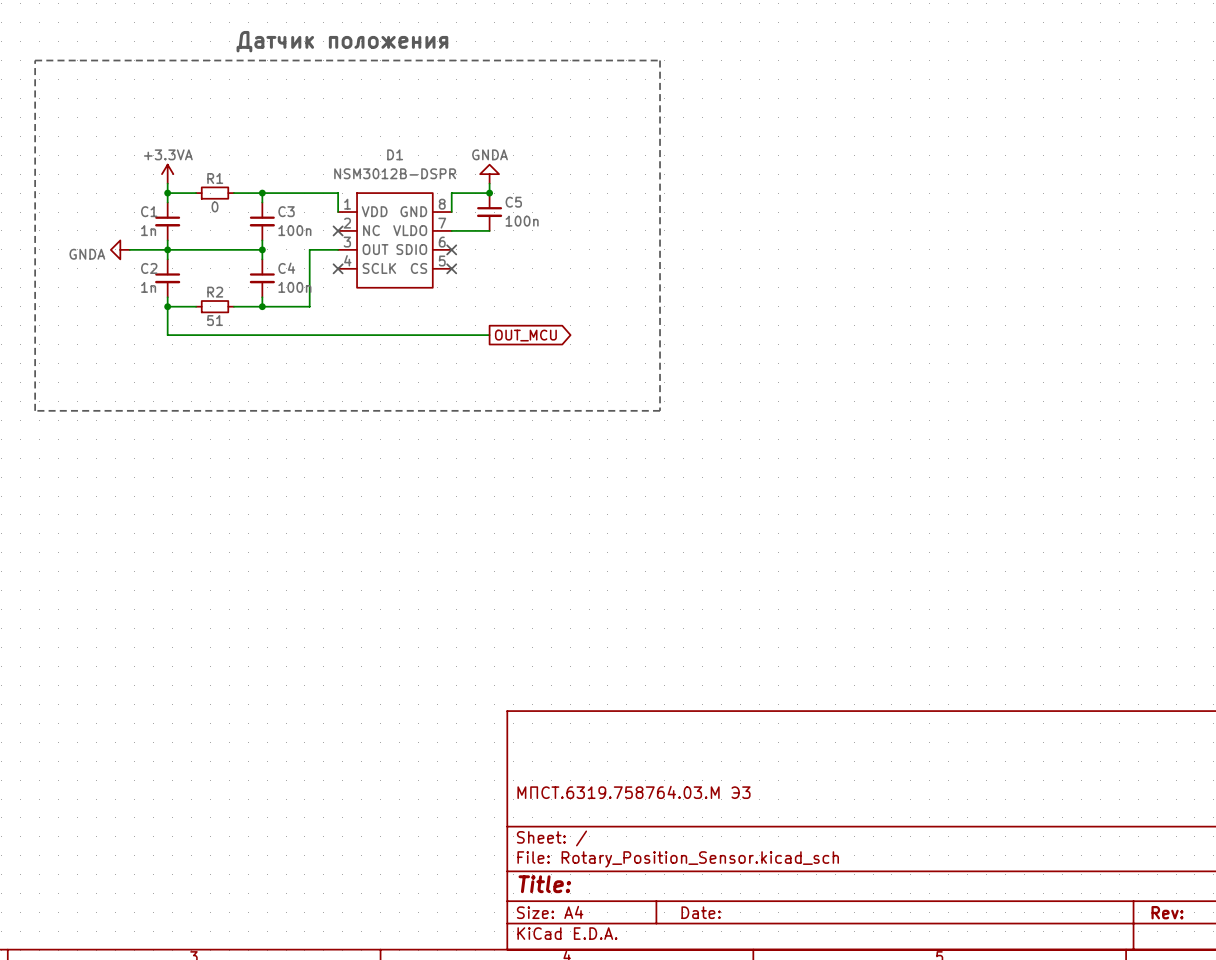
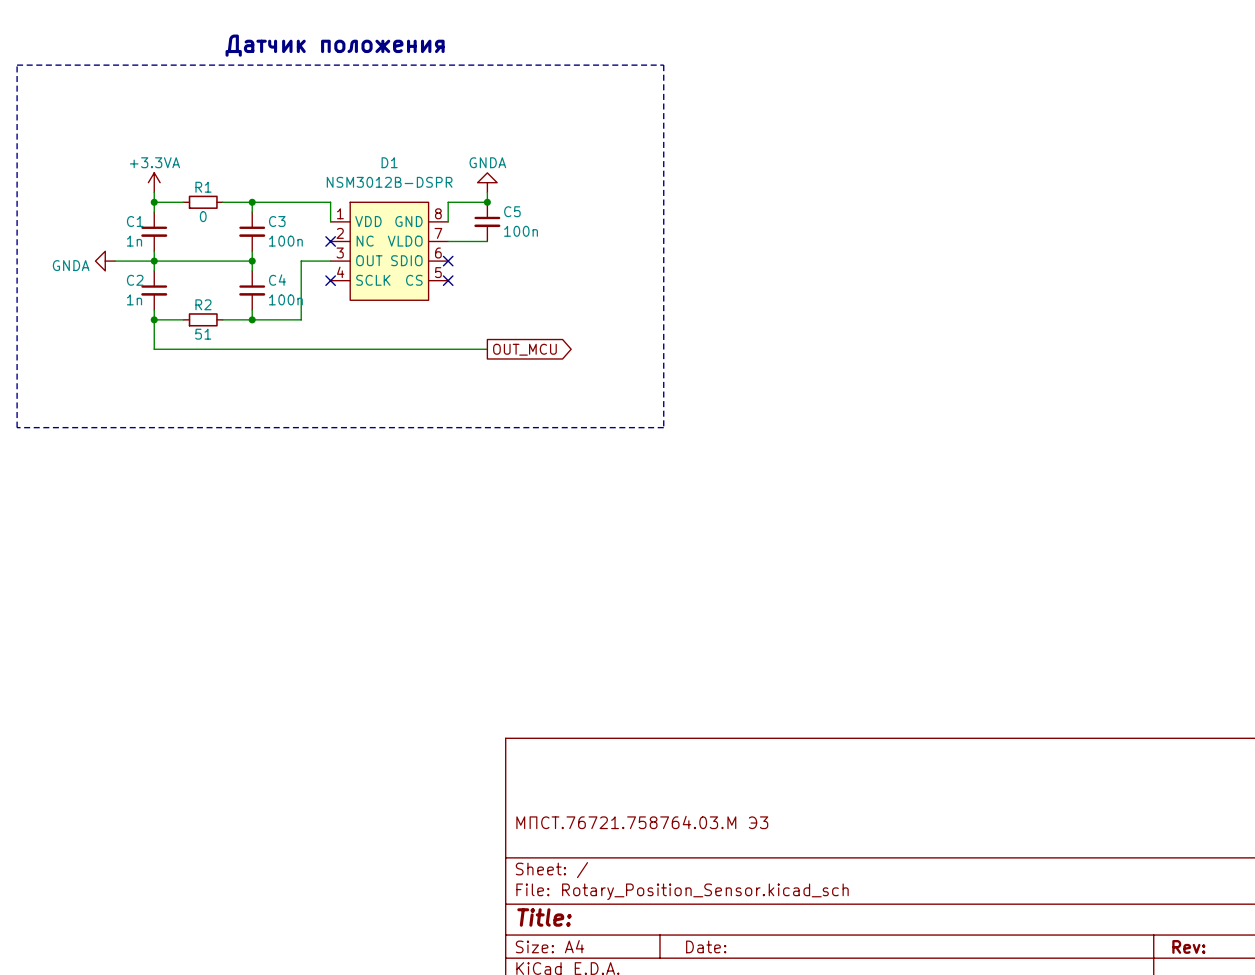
title block: МПСТ.6319.758764.03.М Э3 (633, 792) -> МПСТ.76721.758764.03.М Э3 (642, 822)

